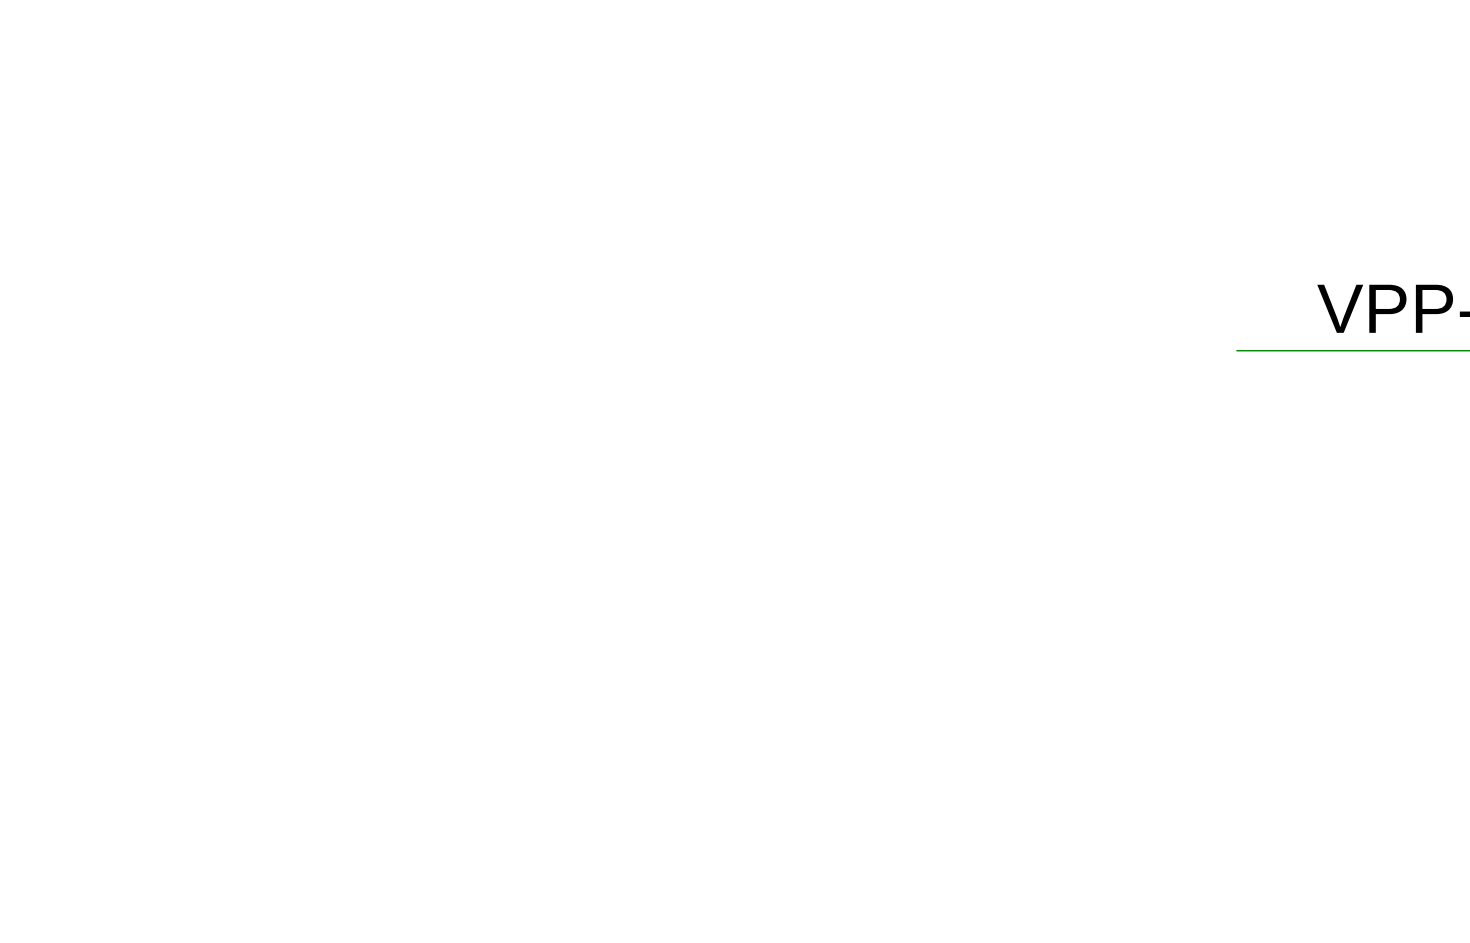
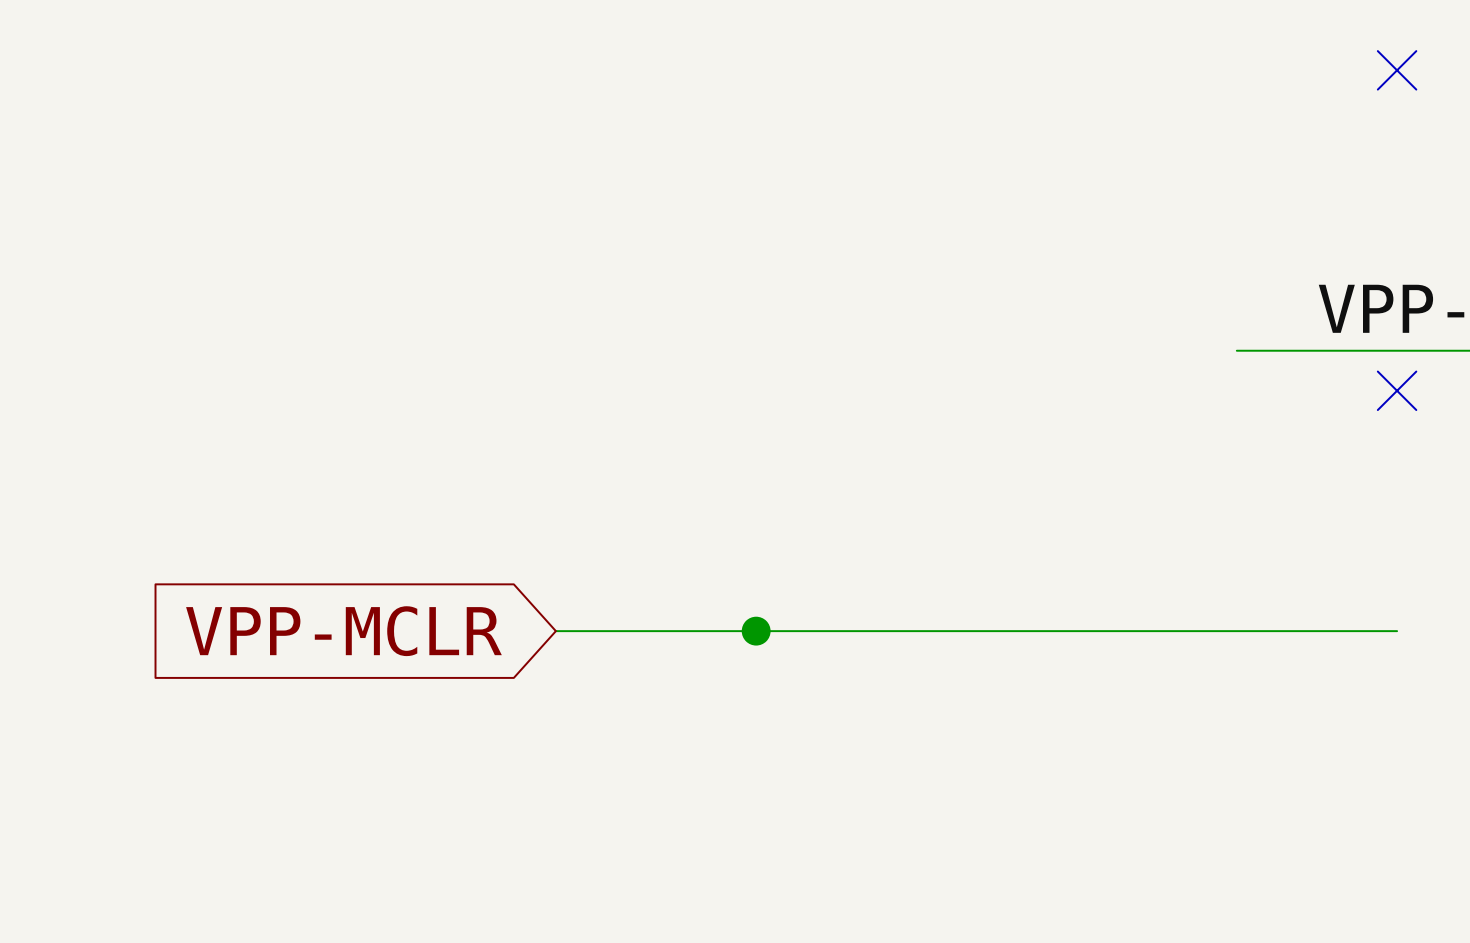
no-connect mark: none -> (1397, 70)
no-connect mark: none -> (1397, 390)
global label: none -> VPP-MCLR (343, 631)
wire: none -> (555, 631) (1397, 631)
junction: none -> (756, 631)

